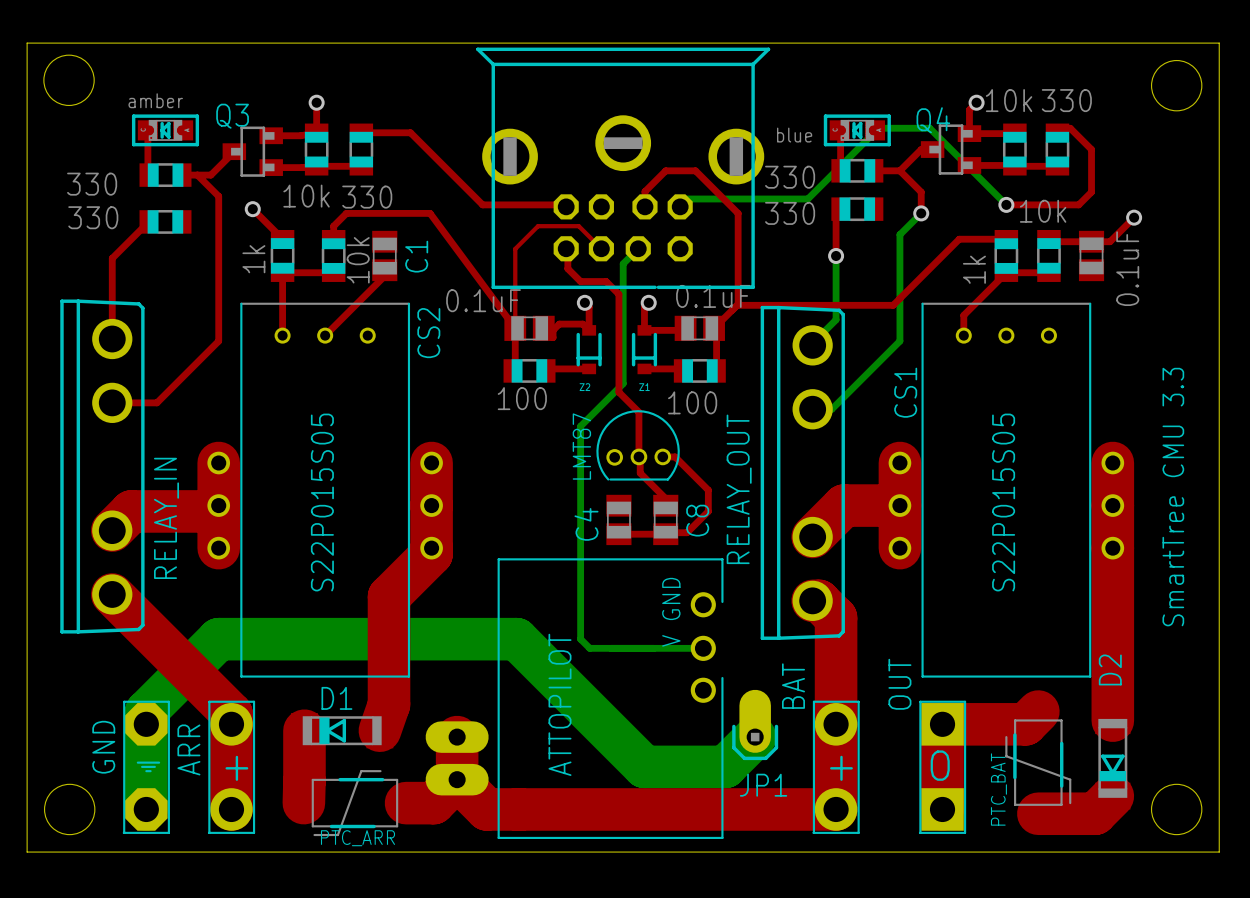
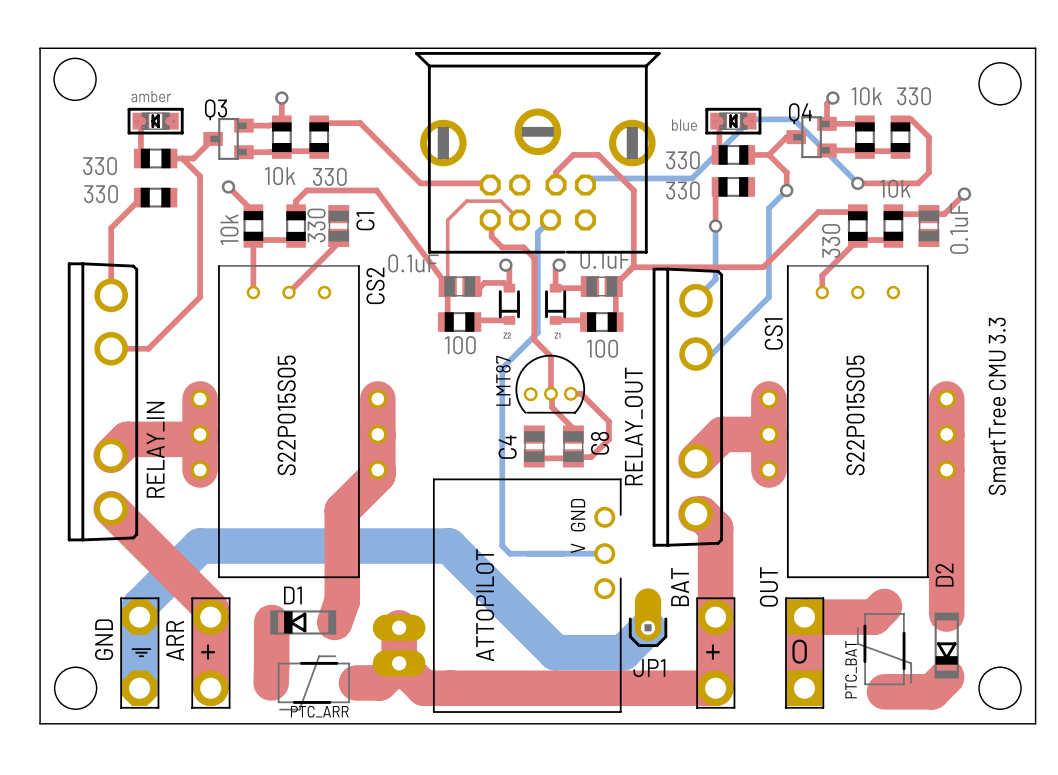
part value: 1k (253, 259) -> 10k (229, 229)
part value: 10k (358, 260) -> 330 (316, 225)
part value: 1k (974, 269) -> 330 (831, 240)

